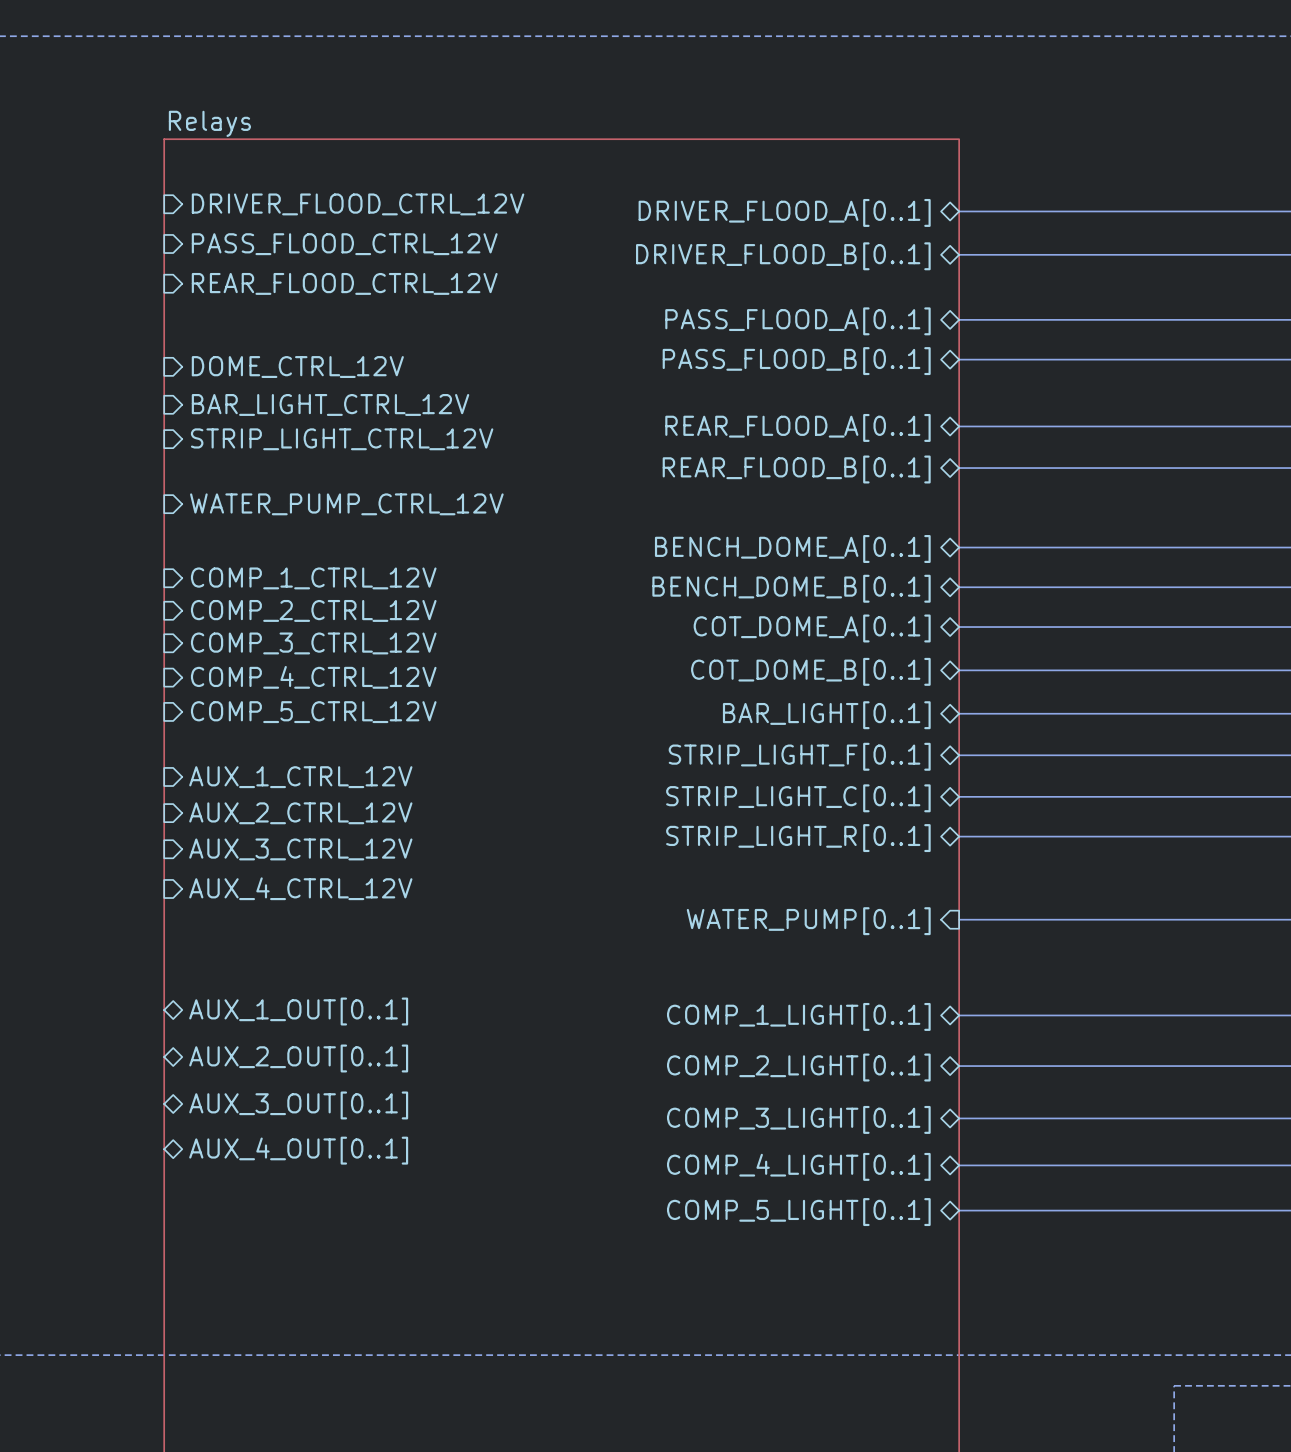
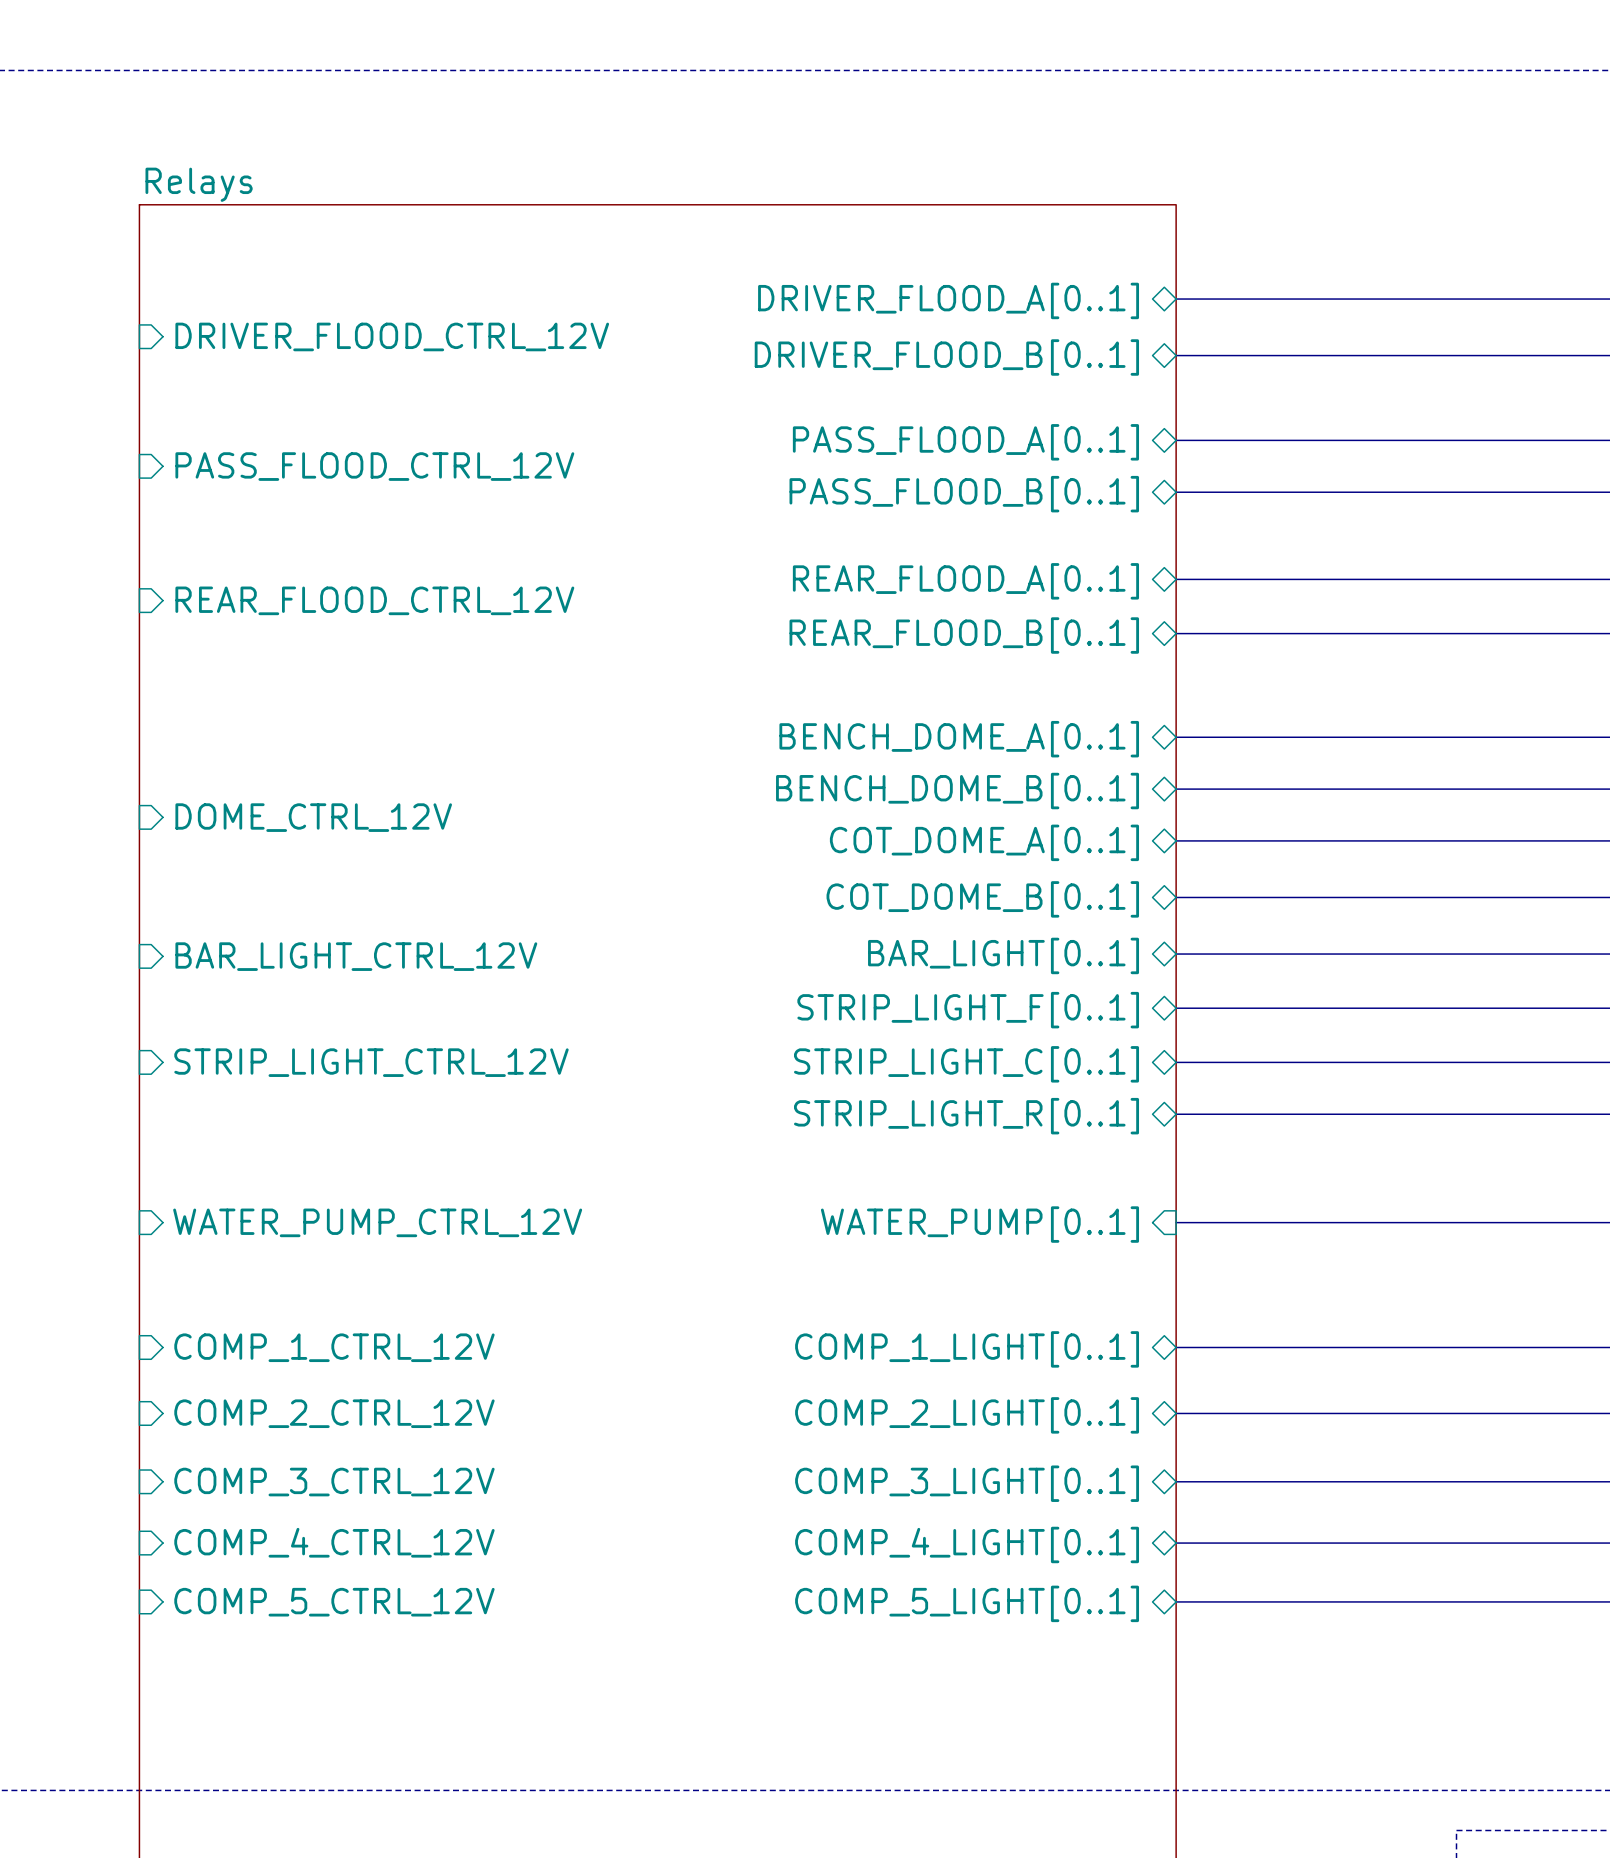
sheet pin position: DRIVER_FLOOD_CTRL_12V (358, 204) -> DRIVER_FLOOD_CTRL_12V (392, 336)
sheet pin position: PASS_FLOOD_CTRL_12V (344, 244) -> PASS_FLOOD_CTRL_12V (374, 466)
sheet pin position: REAR_FLOOD_CTRL_12V (344, 283) -> REAR_FLOOD_CTRL_12V (374, 600)
sheet pin position: DOME_CTRL_12V (297, 367) -> DOME_CTRL_12V (313, 817)
sheet pin position: BAR_LIGHT_CTRL_12V (330, 404) -> BAR_LIGHT_CTRL_12V (356, 956)
sheet pin: STRIP_LIGHT_CTRL_12V (342, 439) -> none
sheet pin: WATER_PUMP_CTRL_12V (346, 504) -> none
sheet pin: COMP_1_CTRL_12V (313, 578) -> none
sheet pin: COMP_2_CTRL_12V (313, 610) -> none
sheet pin: COMP_3_CTRL_12V (313, 643) -> none
sheet pin: COMP_4_CTRL_12V (313, 677) -> none
sheet pin: COMP_5_CTRL_12V (313, 712) -> none
sheet pin: AUX_1_CTRL_12V (300, 777) -> none
sheet pin: none -> STRIP_LIGHT_CTRL_12V (371, 1062)
sheet pin: AUX_2_CTRL_12V (300, 813) -> none
sheet pin: AUX_3_CTRL_12V (300, 849) -> none
sheet pin: AUX_4_CTRL_12V (300, 888) -> WATER_PUMP_CTRL_12V (377, 1222)
sheet pin shape: bidirectional (298, 1011) -> input (334, 1347)
sheet pin: AUX_1_OUT[0..1] (298, 1011) -> COMP_1_CTRL_12V (334, 1347)
sheet pin shape: bidirectional (298, 1058) -> input (334, 1413)
sheet pin: AUX_2_OUT[0..1] (298, 1058) -> COMP_2_CTRL_12V (334, 1413)
sheet pin: AUX_3_OUT[0..1] (298, 1105) -> none
sheet pin: none -> COMP_3_CTRL_12V (334, 1482)
sheet pin: AUX_4_OUT[0..1] (298, 1150) -> none
sheet pin: none -> COMP_4_CTRL_12V (334, 1542)
sheet pin: none -> COMP_5_CTRL_12V (334, 1602)

